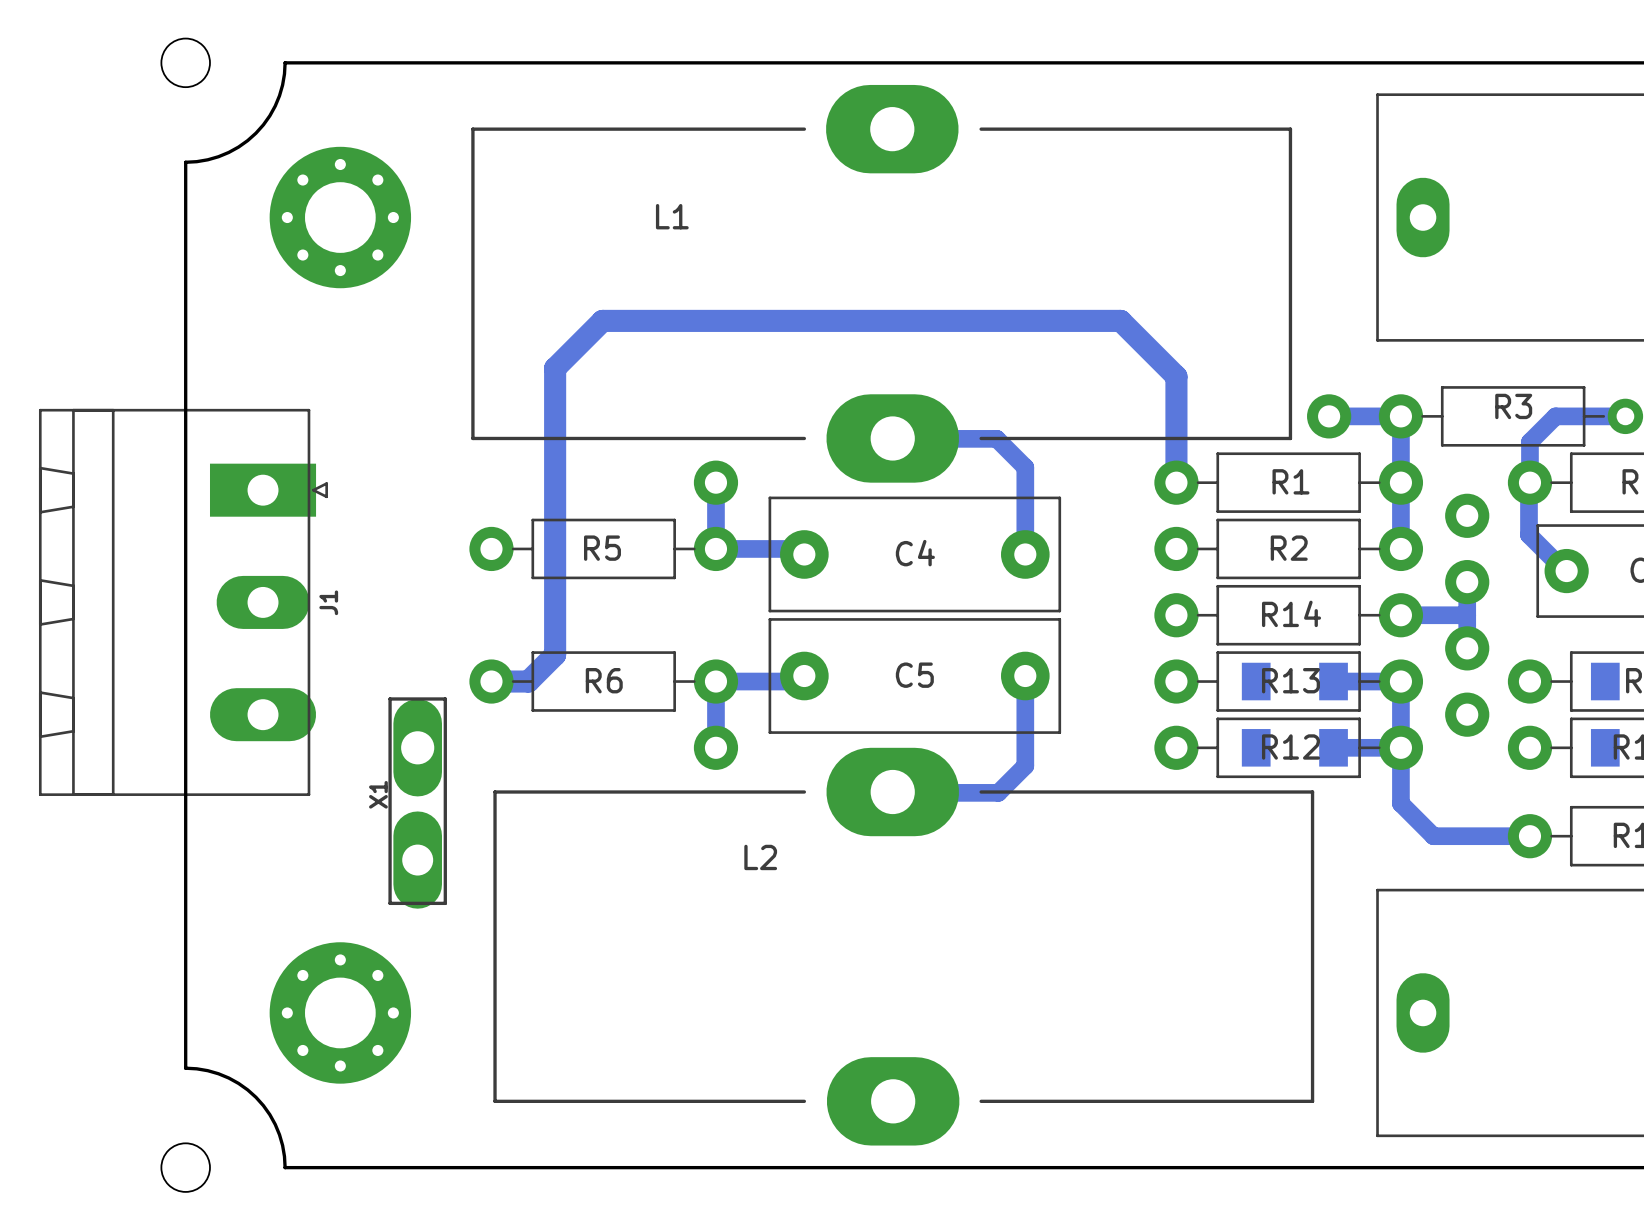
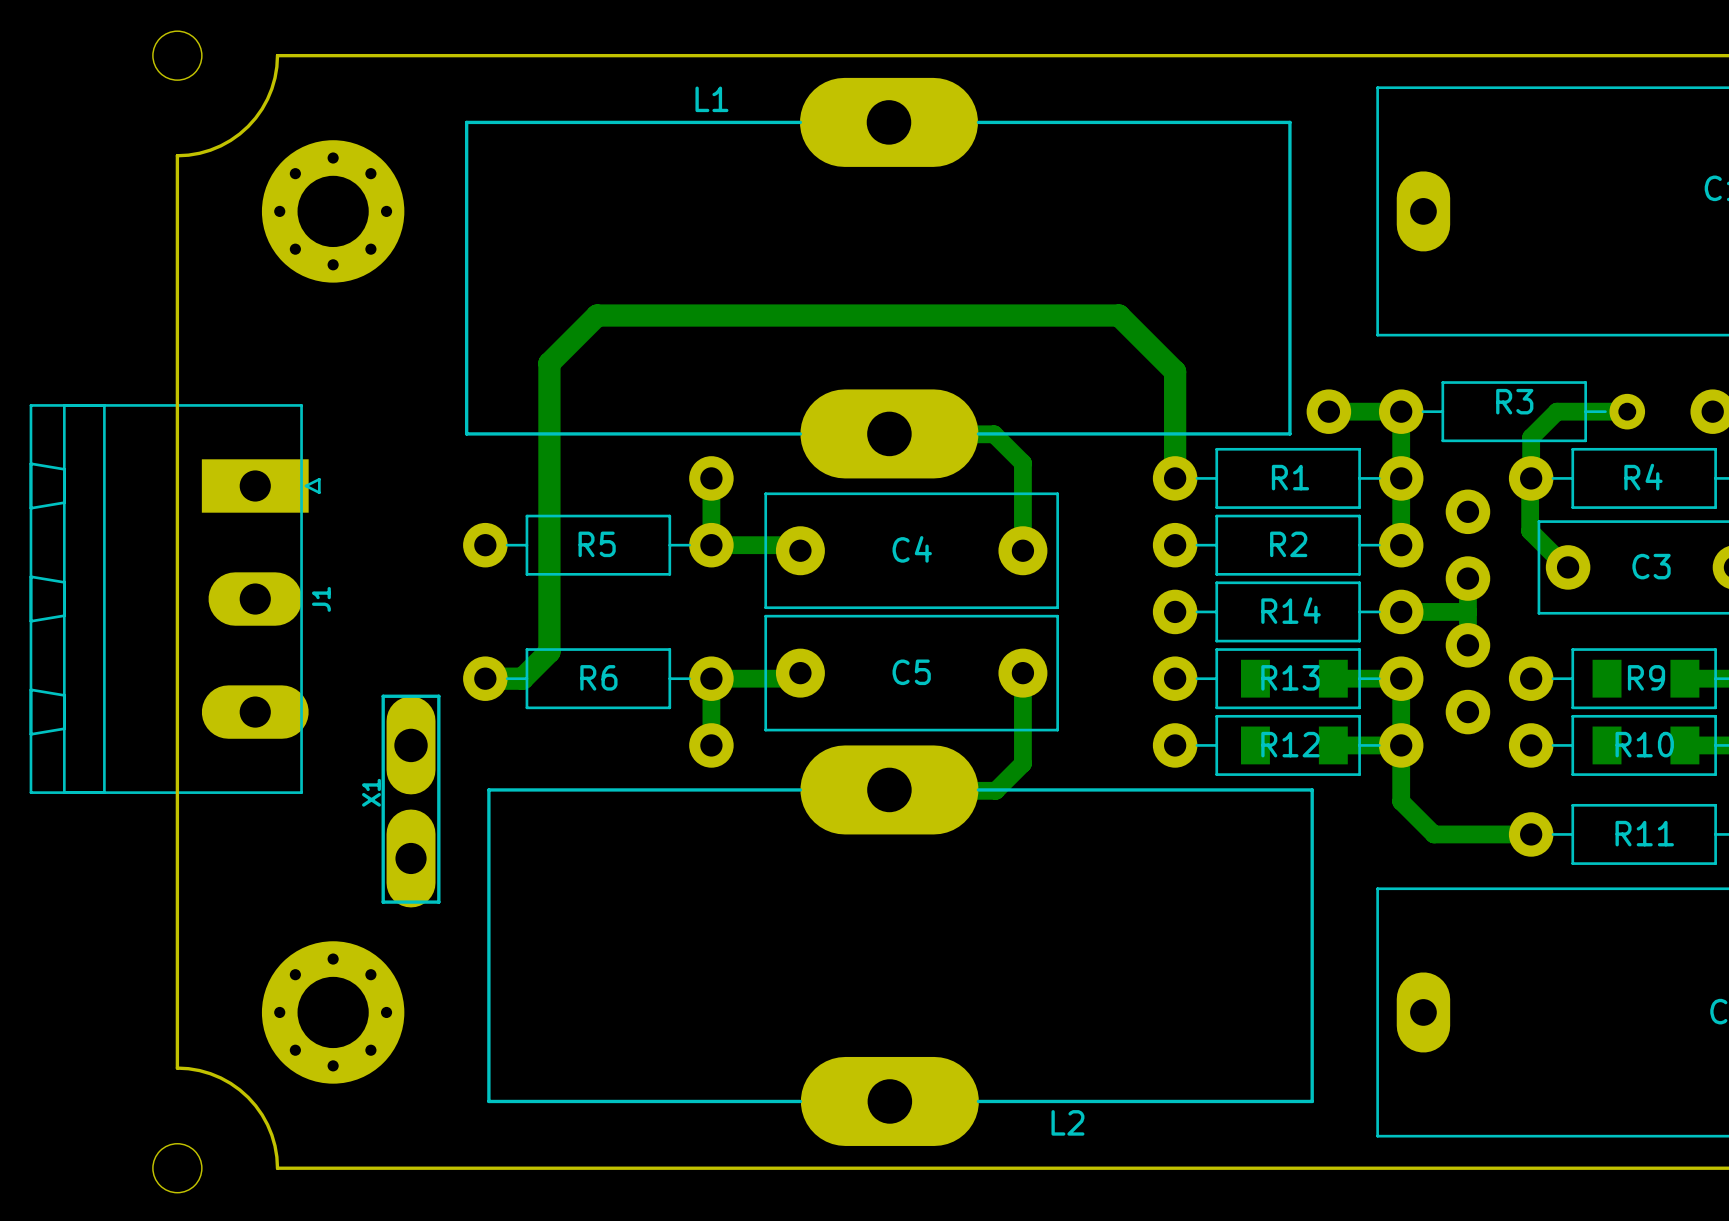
L1 footprint: [471, 84, 1293, 483] -> [464, 77, 1292, 479]
L1 name position: L1 (672, 216) -> L1 (711, 99)
L2 footprint: [493, 747, 1315, 1146] -> [487, 745, 1314, 1146]
L2 name position: L2 (760, 857) -> L2 (1067, 1122)

